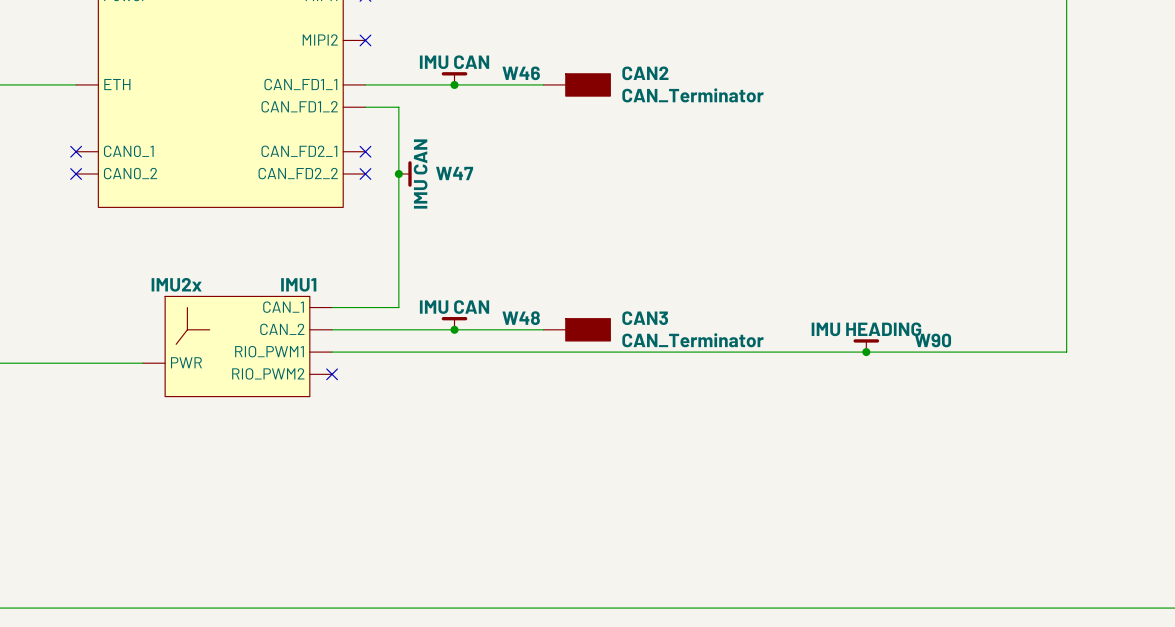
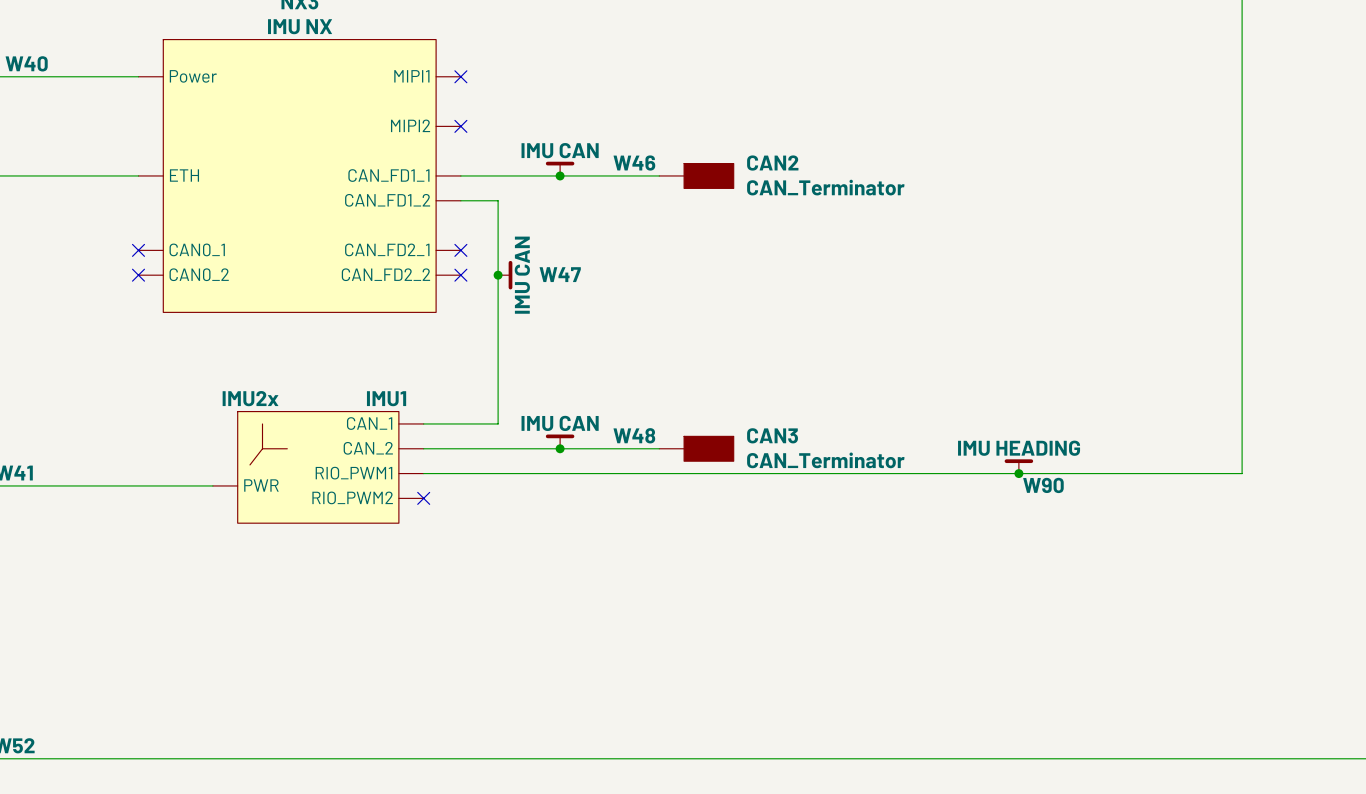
W90 name position: W90 (932, 340) -> W90 (1043, 485)

